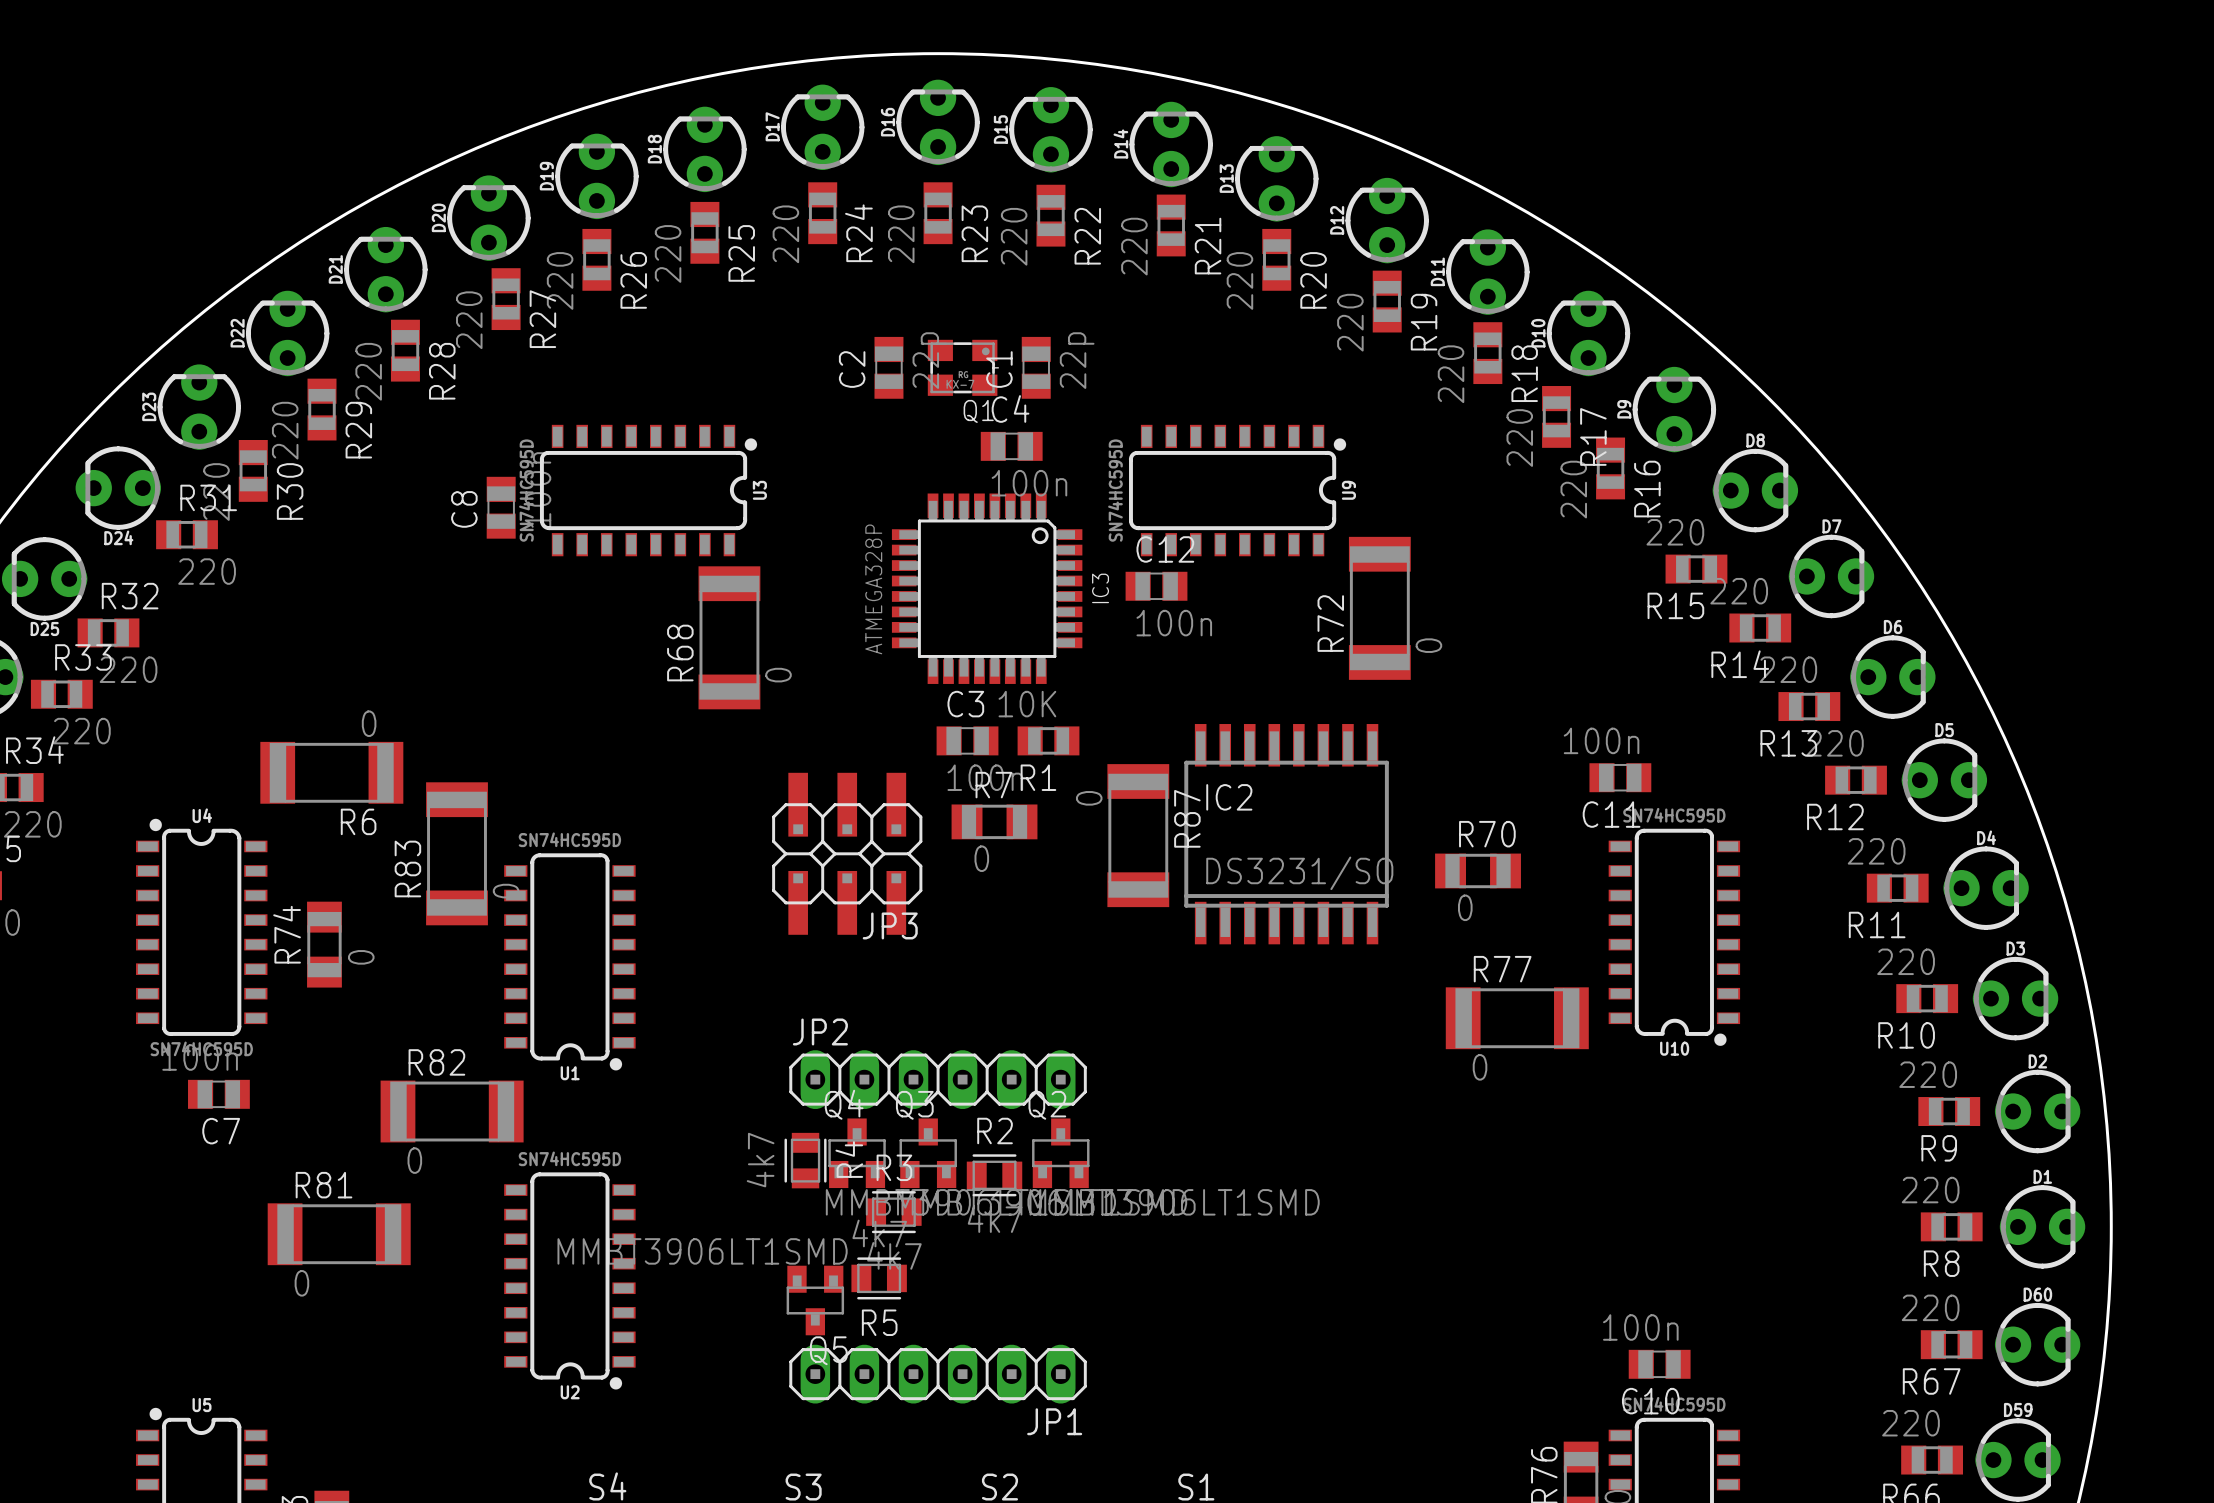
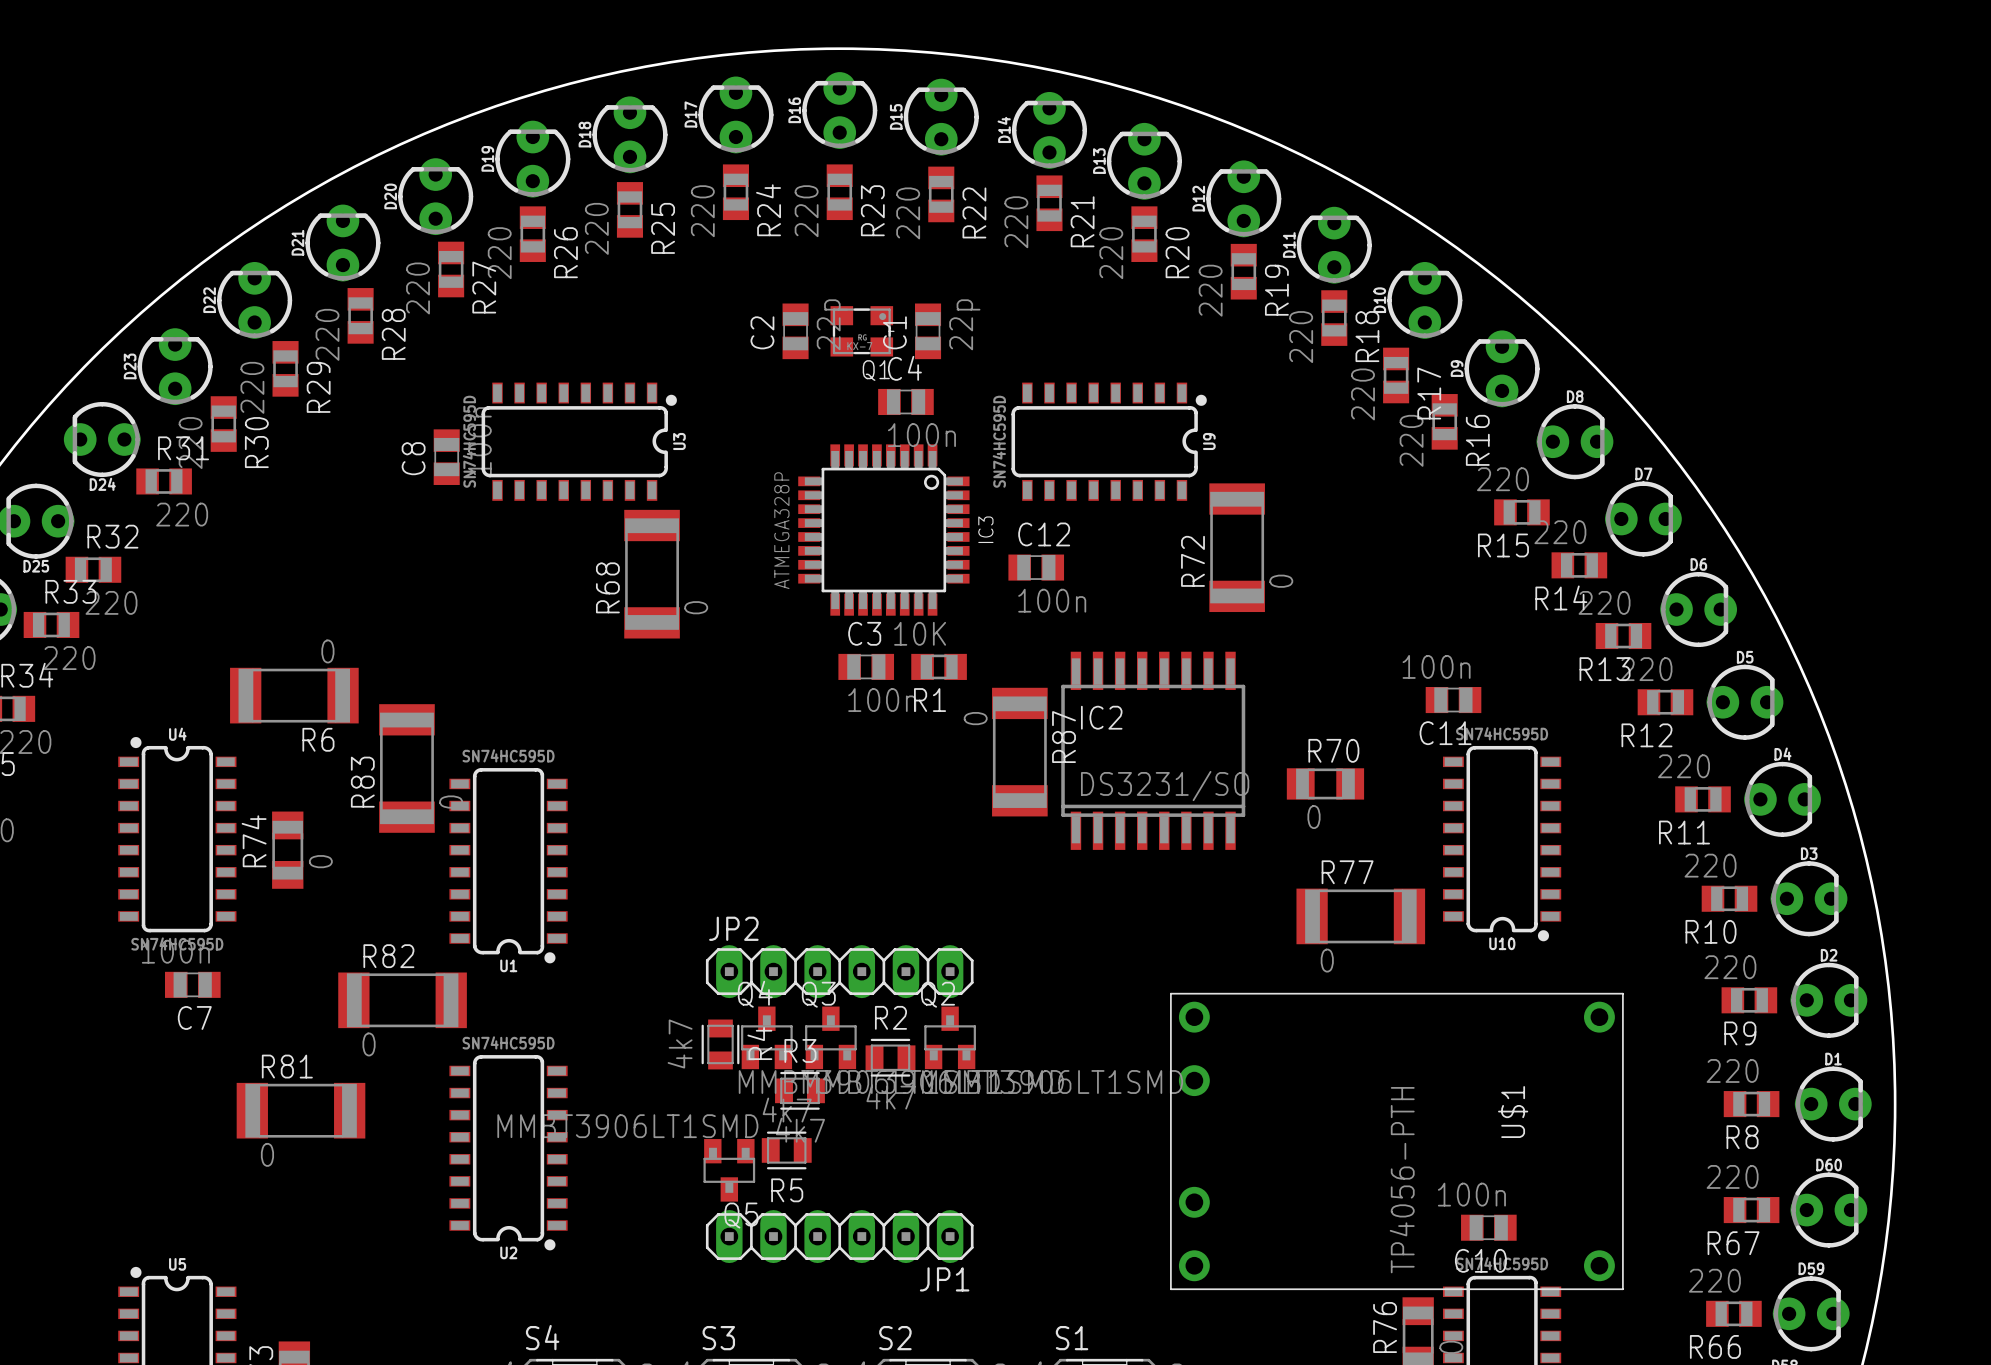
C12 position: (1156, 586) -> (1036, 567)
R7: 0 (994, 821) -> none
JP3: (847, 853) -> none
U$1: none -> TP4056-PTH (1396, 1141)

